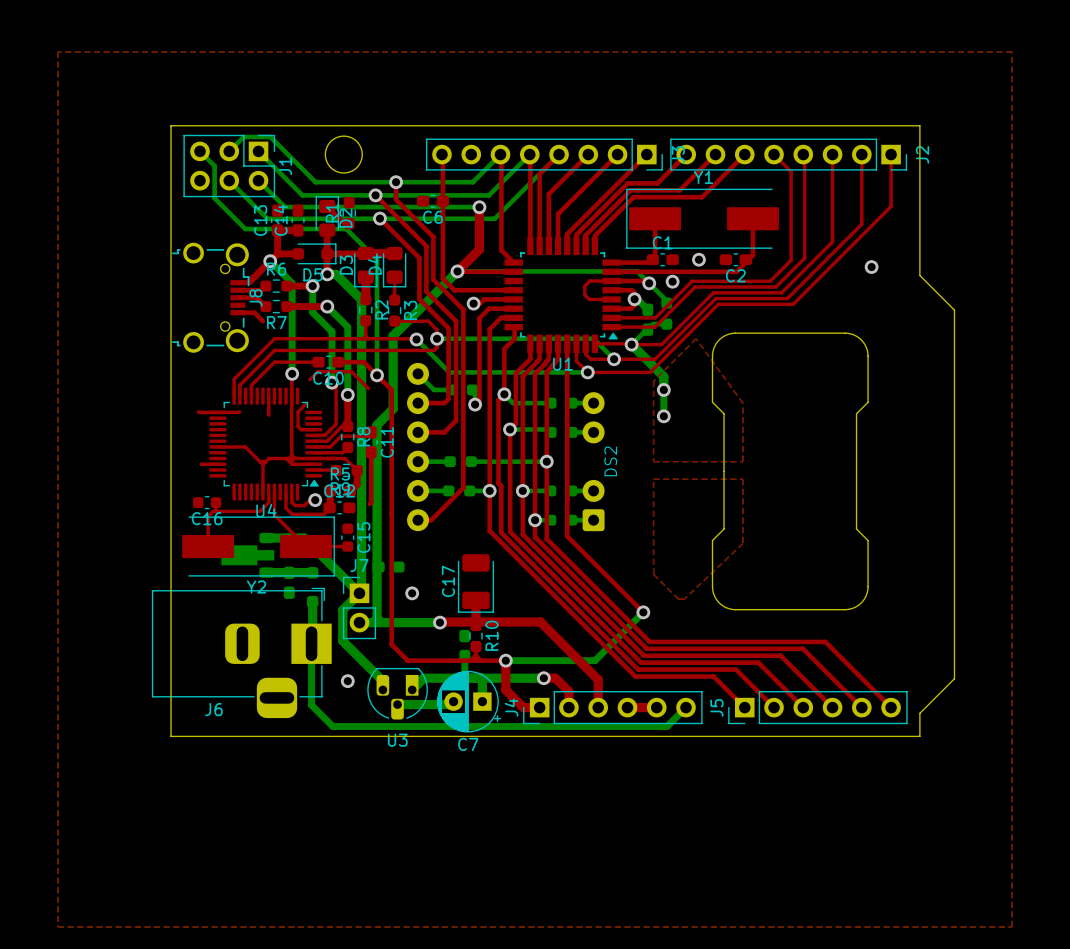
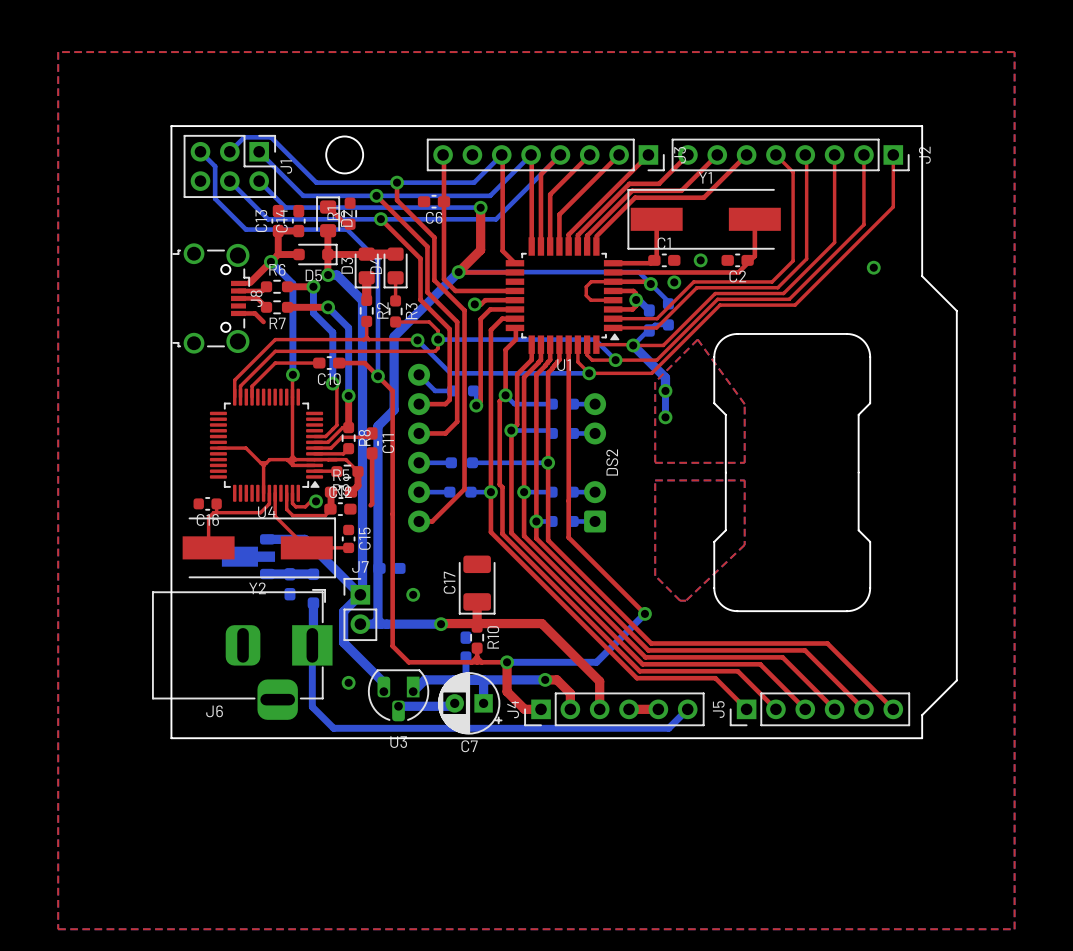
top track: (309, 379) (317, 371) (351, 371) (368, 388) -> none
top track: (268, 396) (268, 414) -> none
top track: (306, 403) (298, 411) (298, 426) (301, 429) (313, 429) -> none
top track: (198, 411) (239, 411) -> none
top track: (217, 464) (201, 464) -> none

